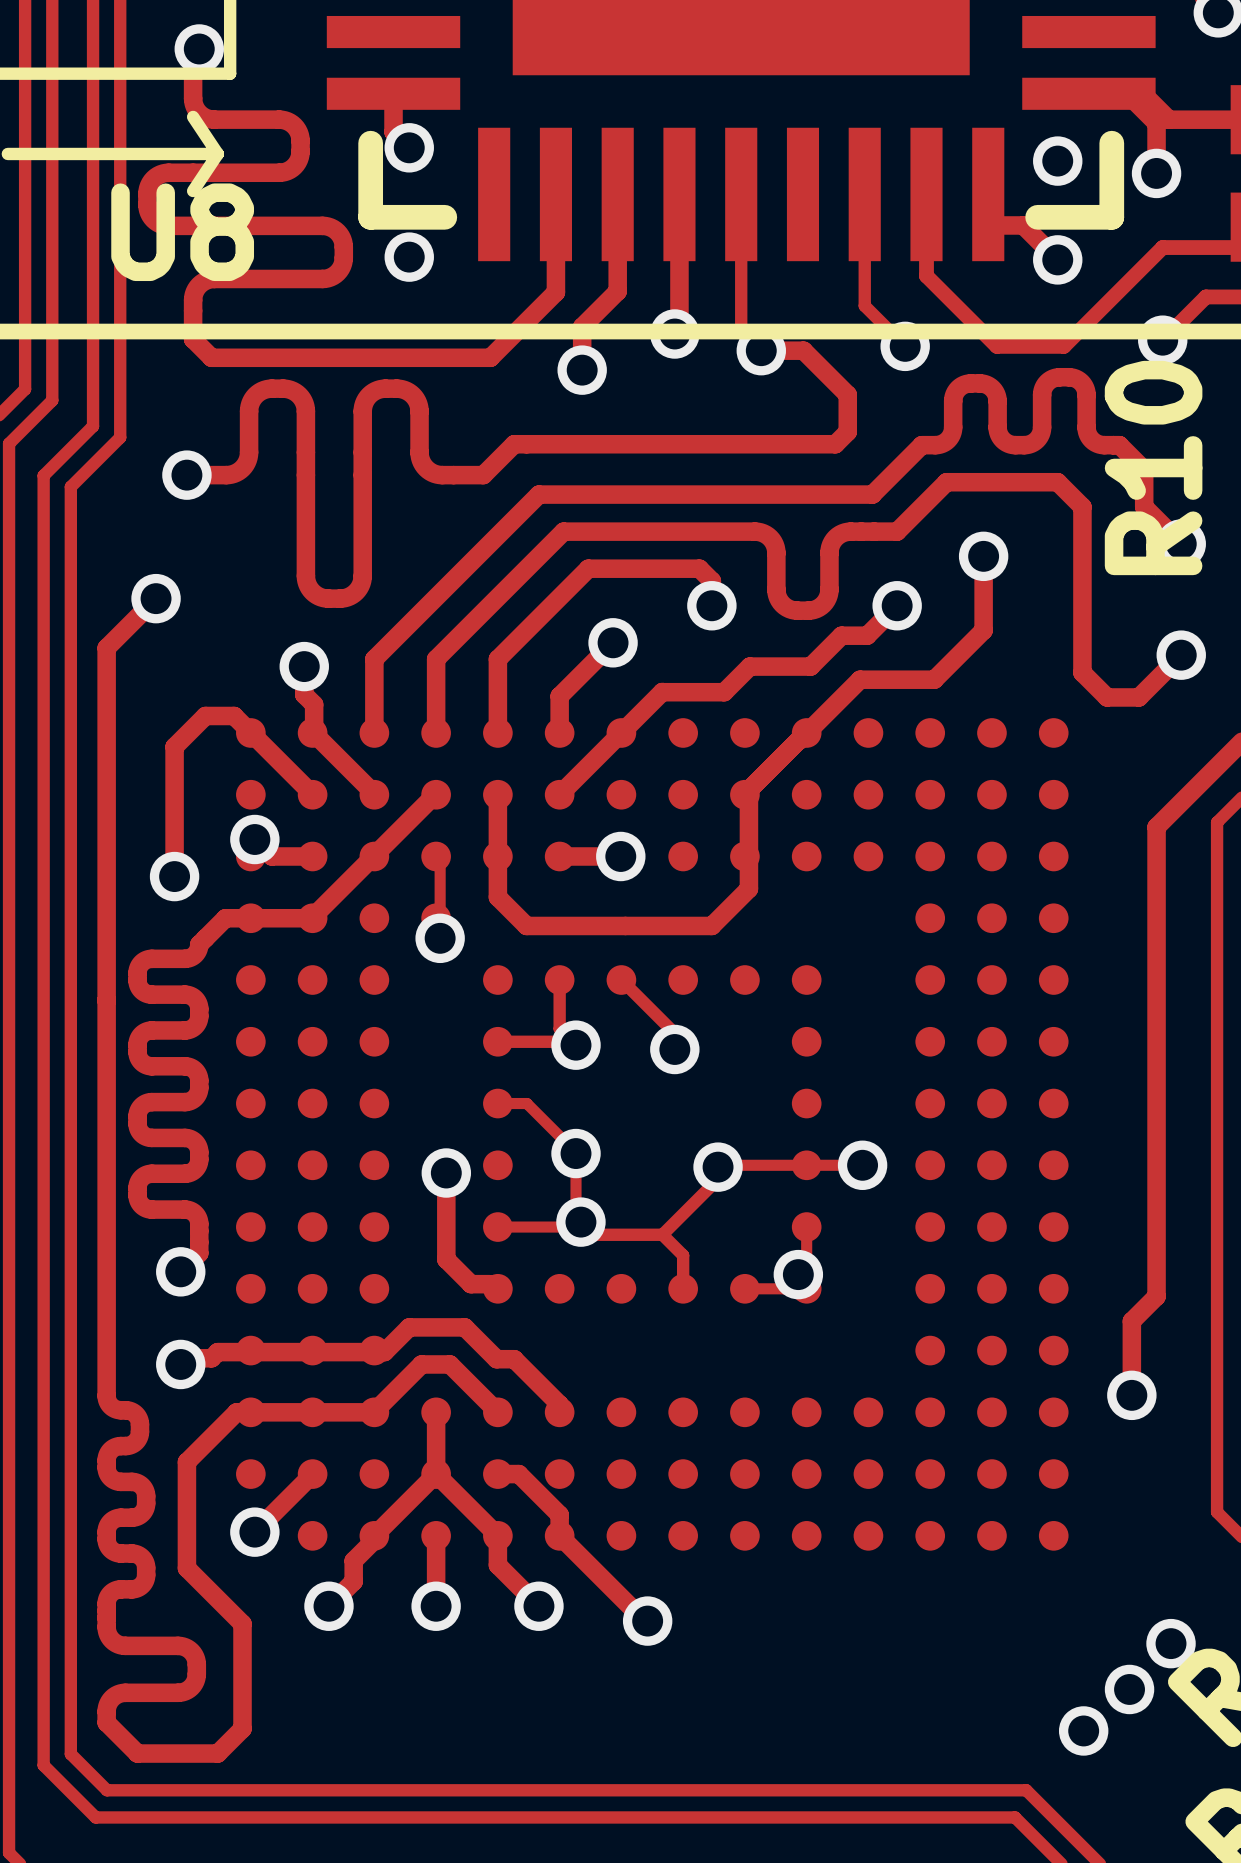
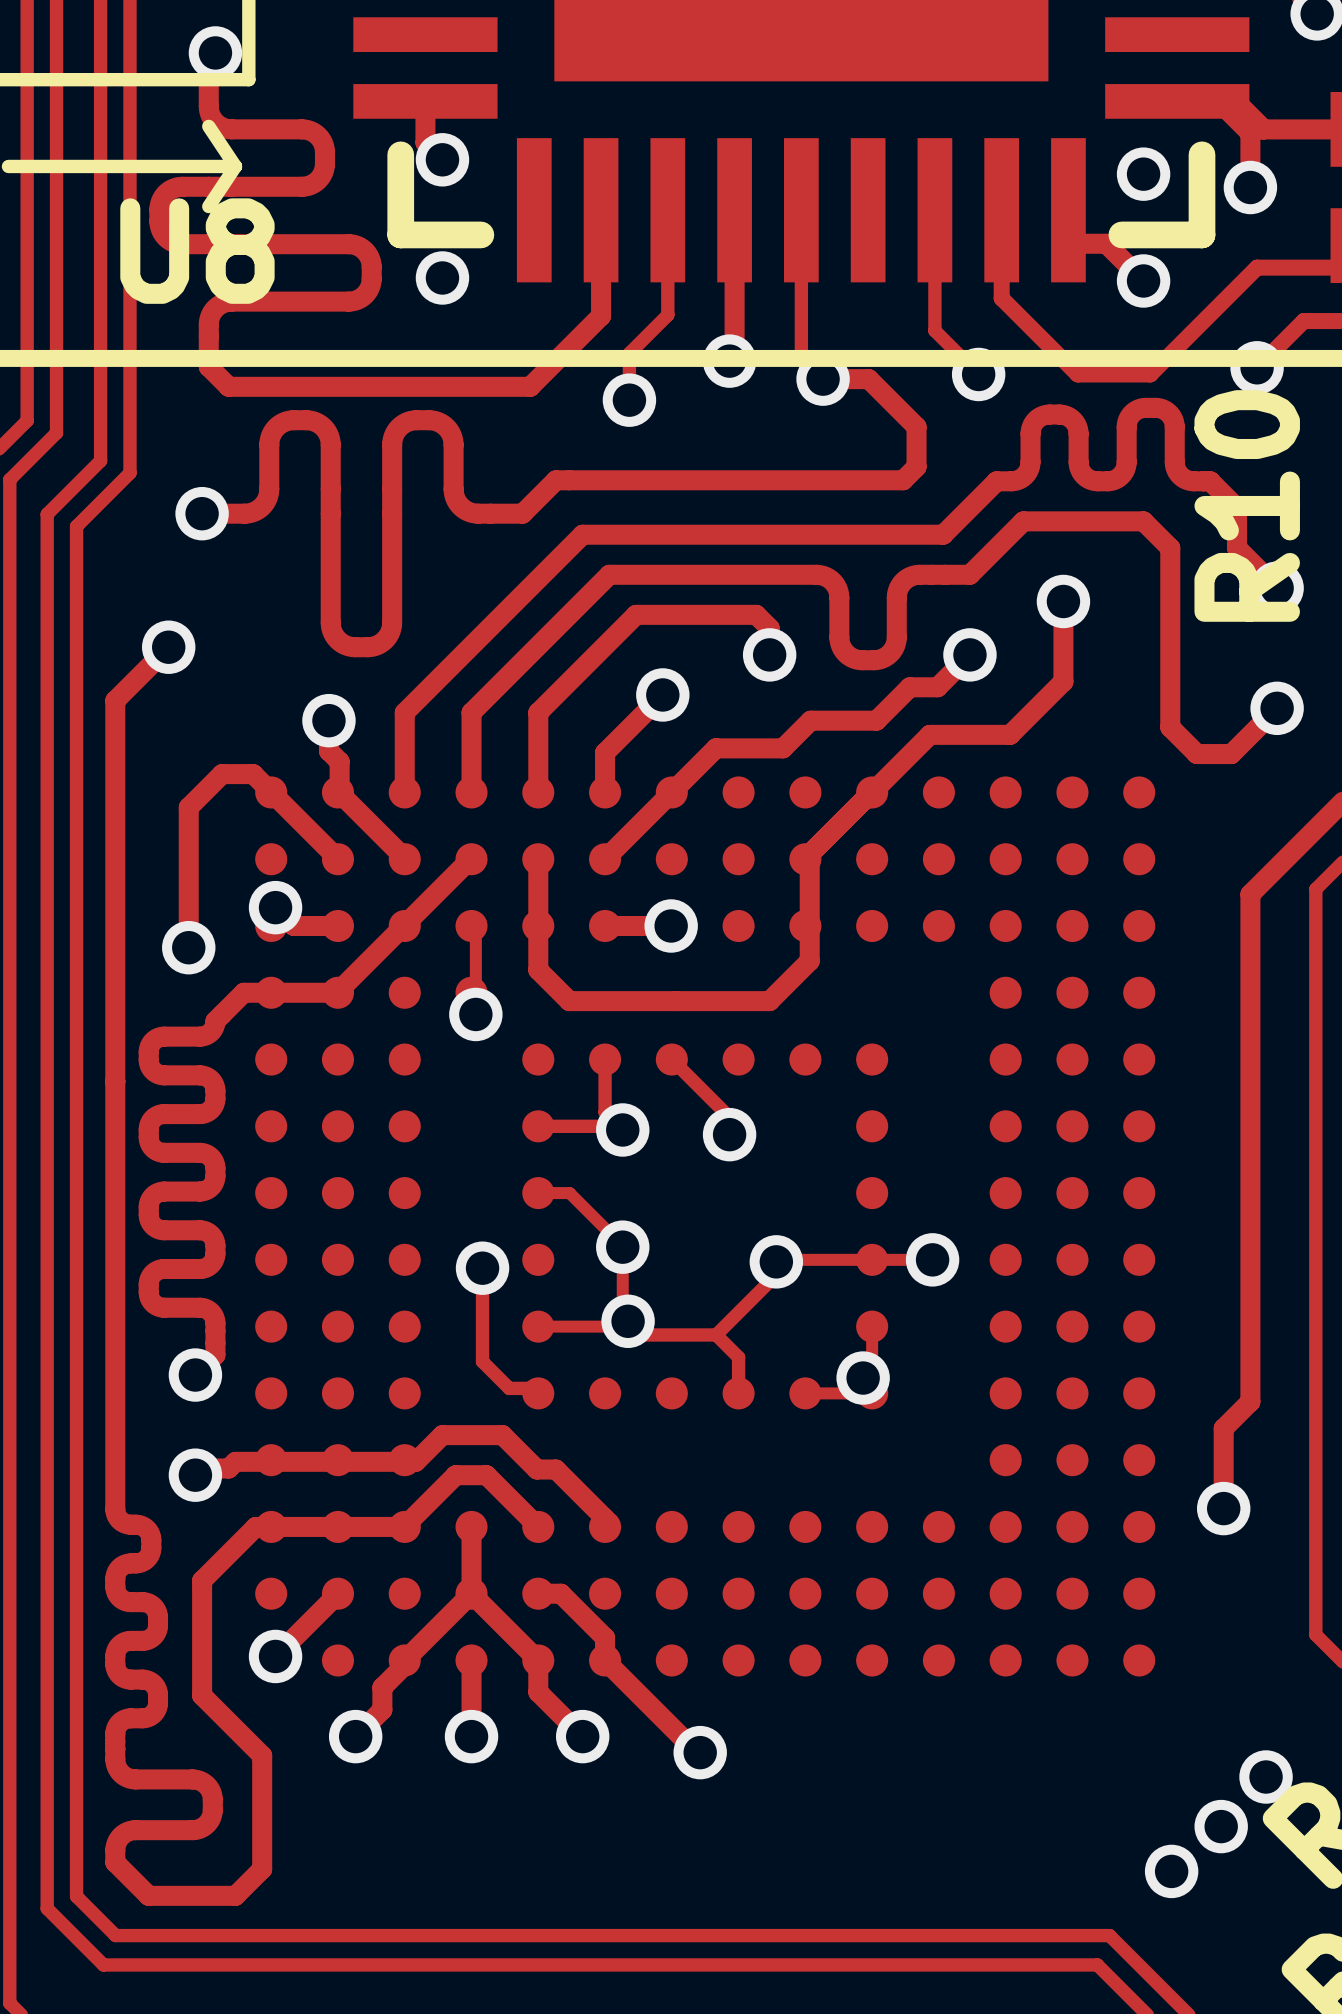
track width: thick (617, 194) (617, 291) (582, 326) (582, 370) -> thin (667, 210) (667, 315) (629, 353) (629, 400)
track width: thick (446, 1173) (446, 1259) (471, 1284) (489, 1284) (494, 1288) -> thin (482, 1268) (482, 1361) (509, 1388) (529, 1388) (534, 1393)

